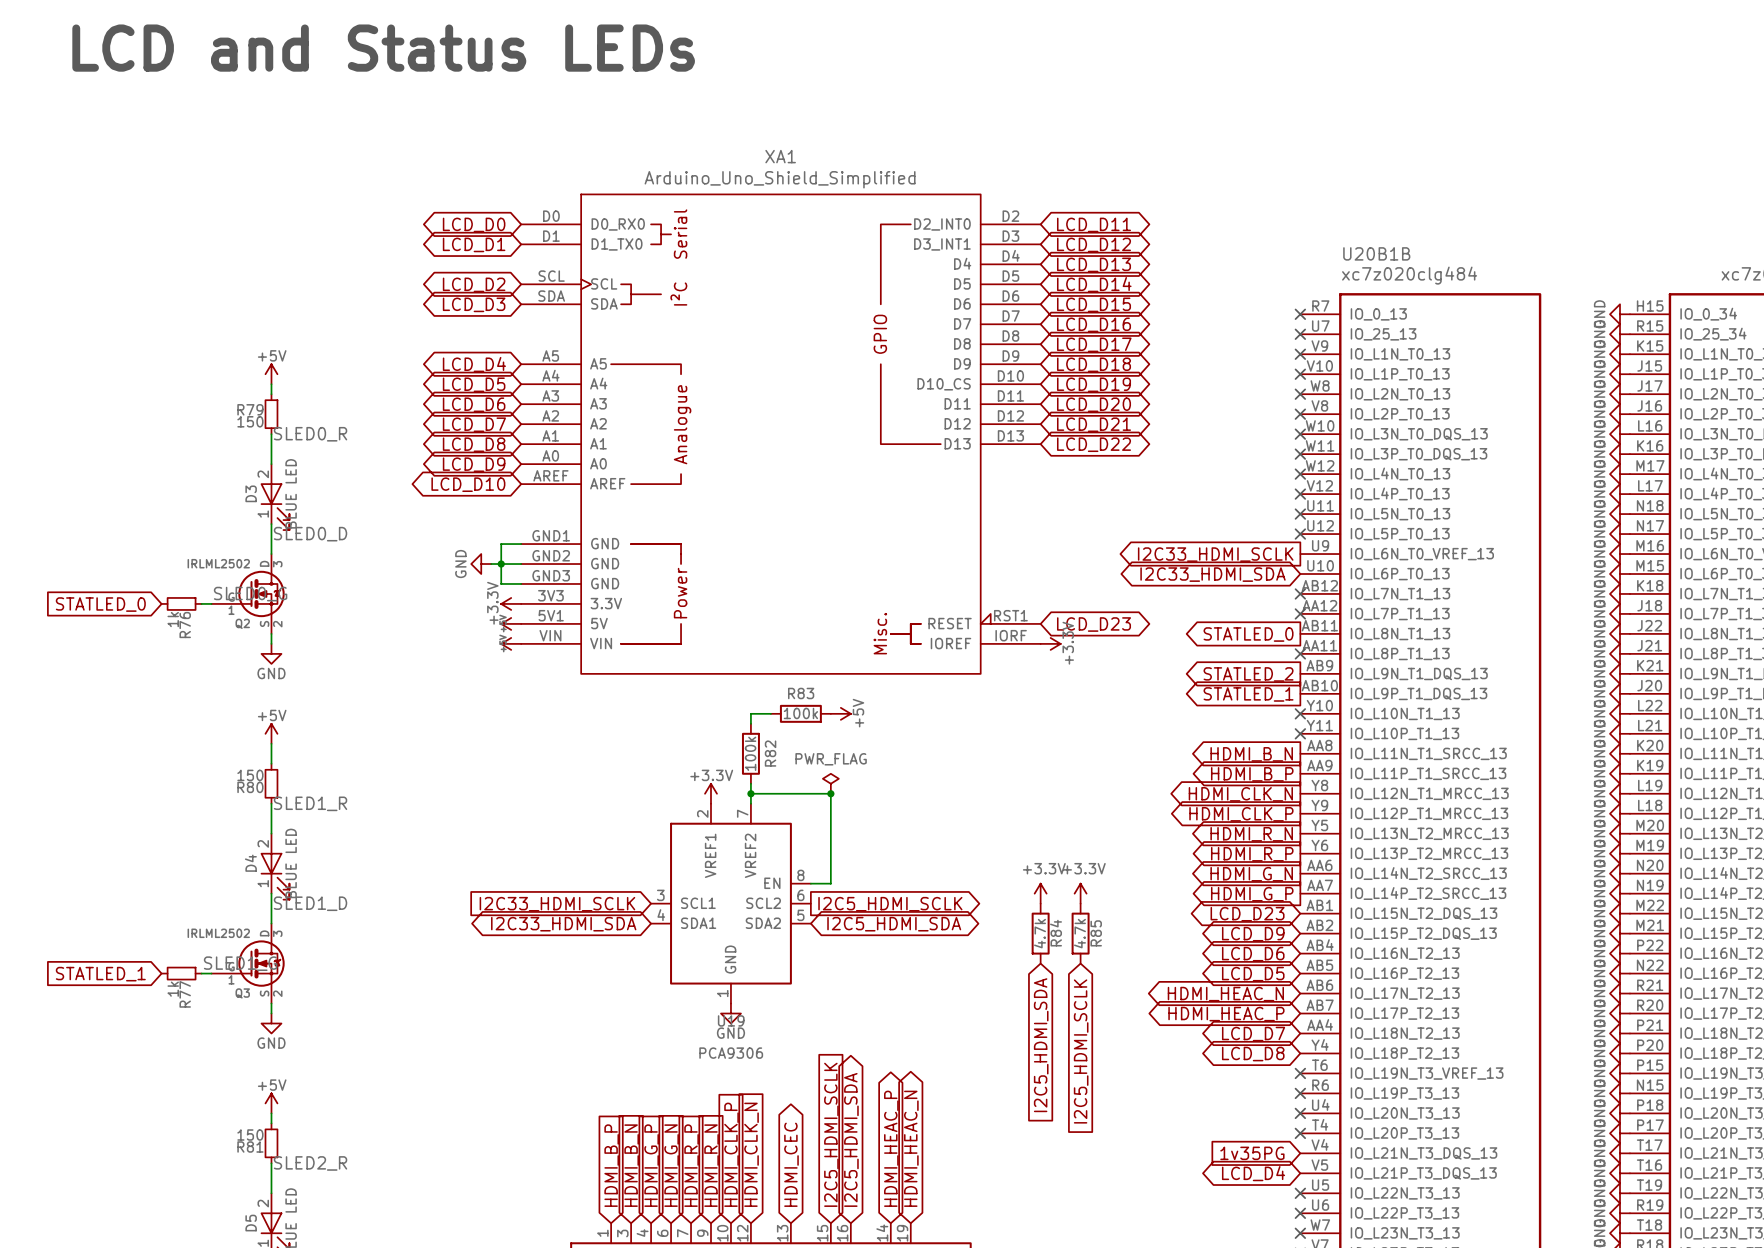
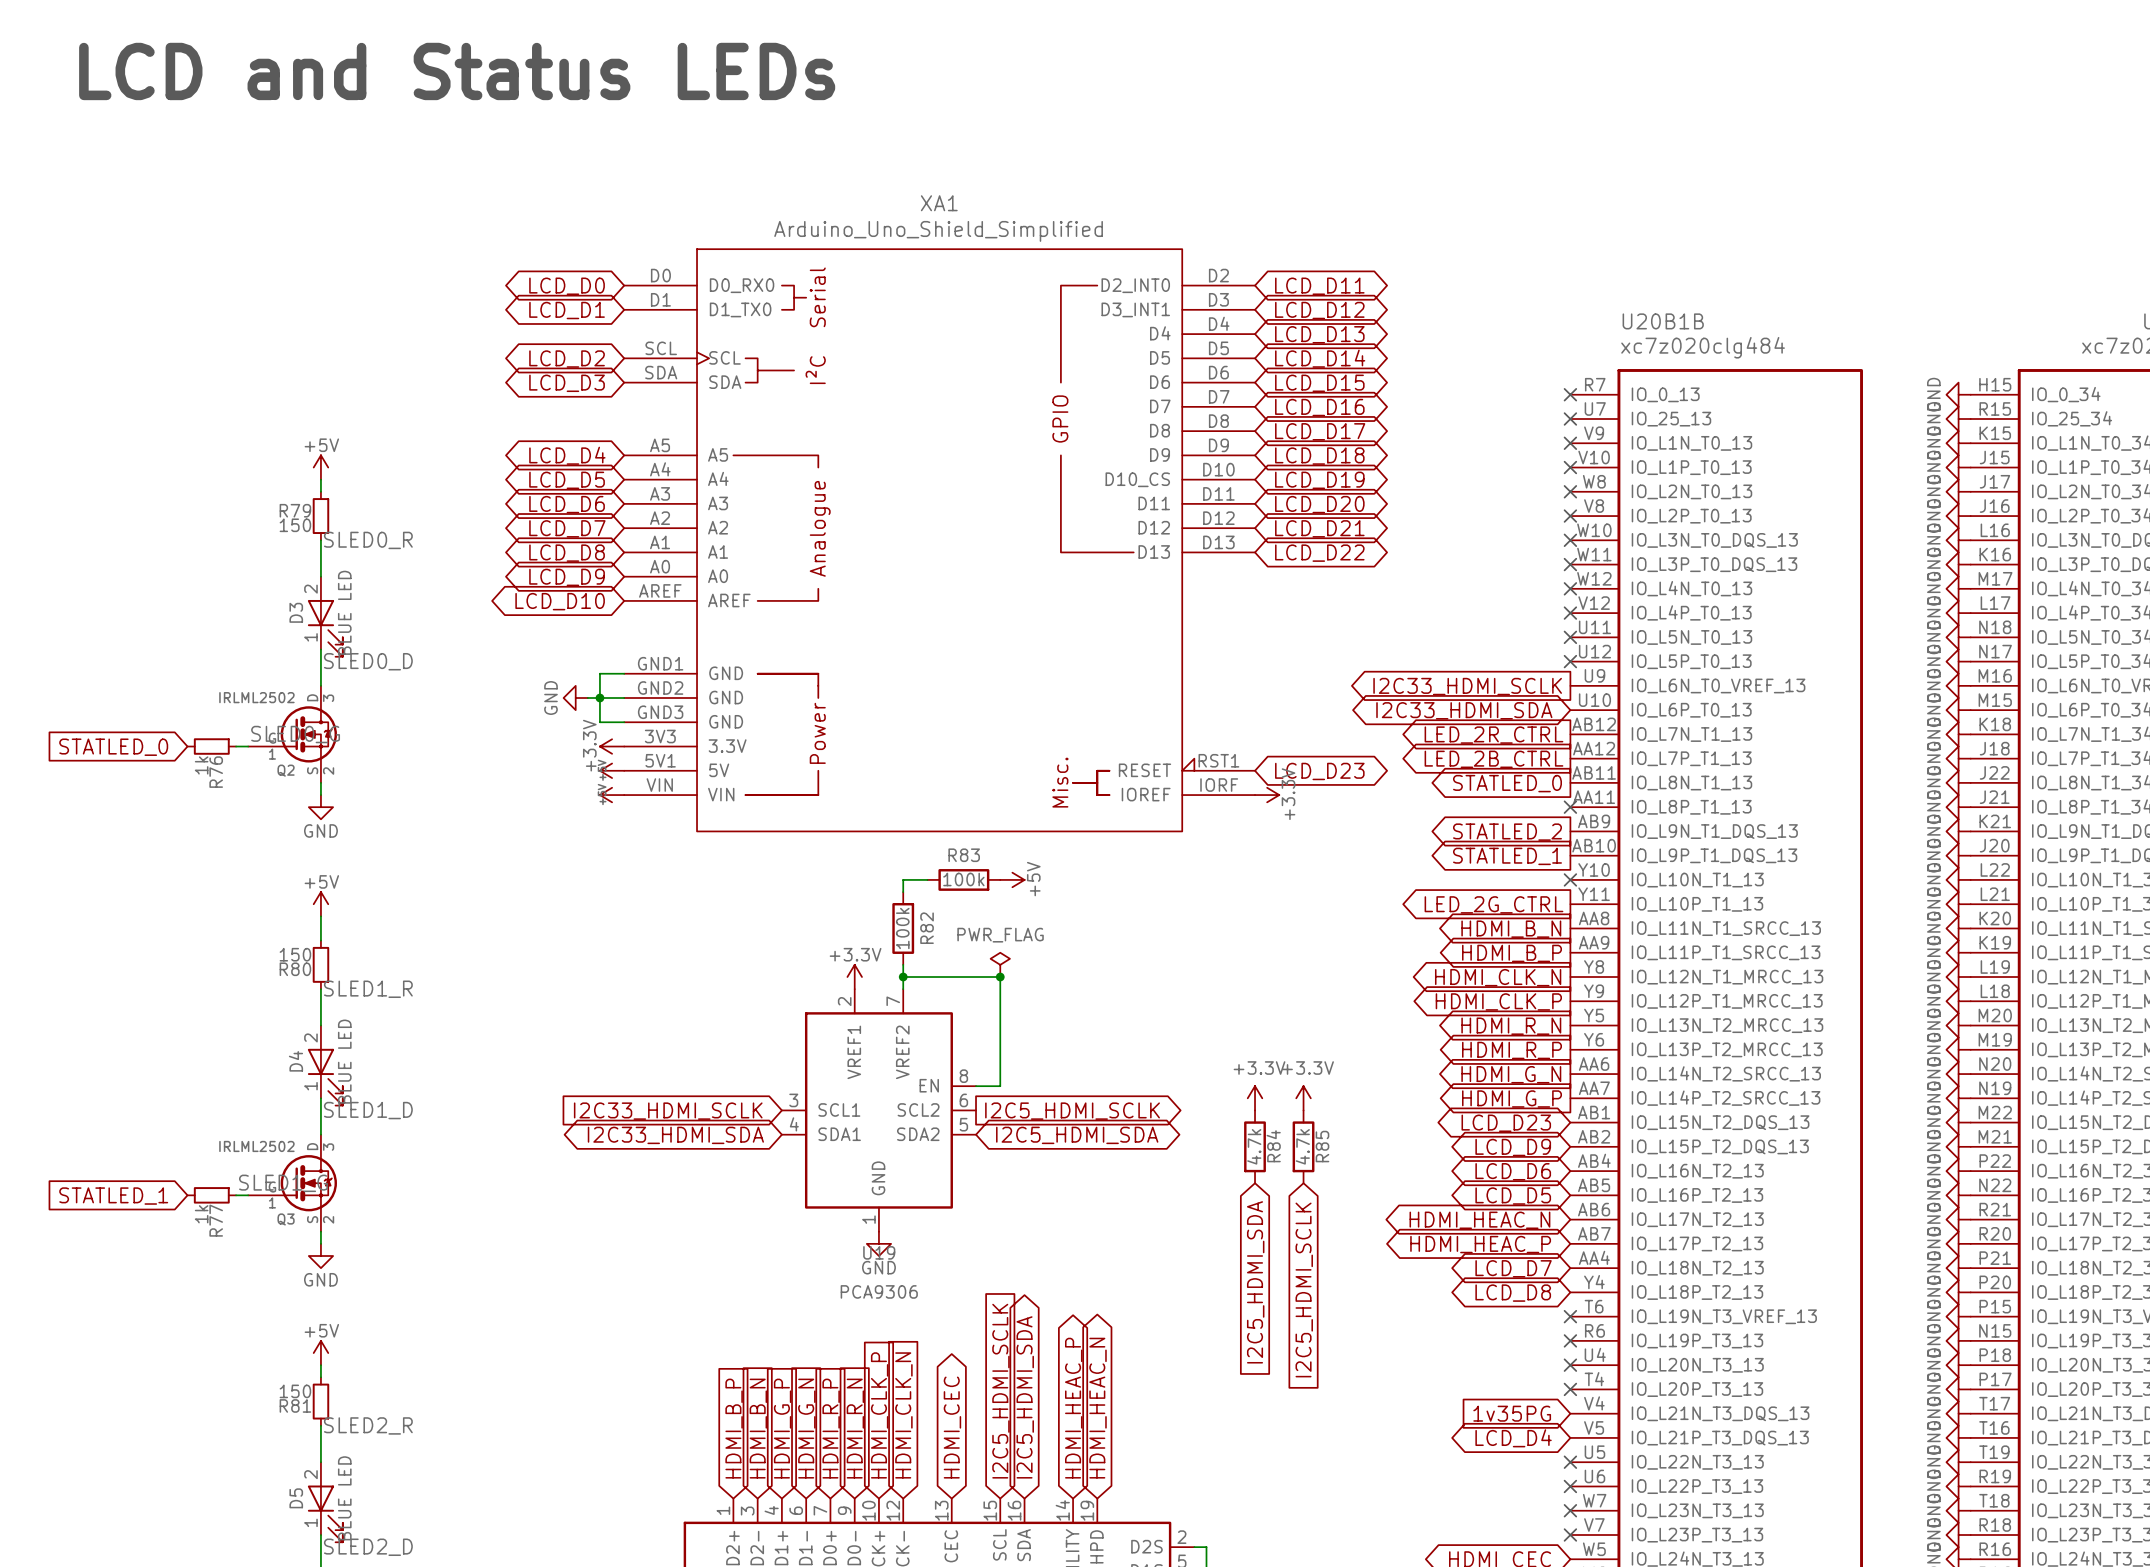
no-connect mark: (1300, 593) -> none
global label: none -> LED_2R_CTRL (1493, 735)
no-connect mark: (1300, 613) -> none
global label: none -> LED_2B_CTRL (1493, 759)
no-connect mark: (1300, 733) -> none
global label: none -> LED_2G_CTRL (1493, 904)

